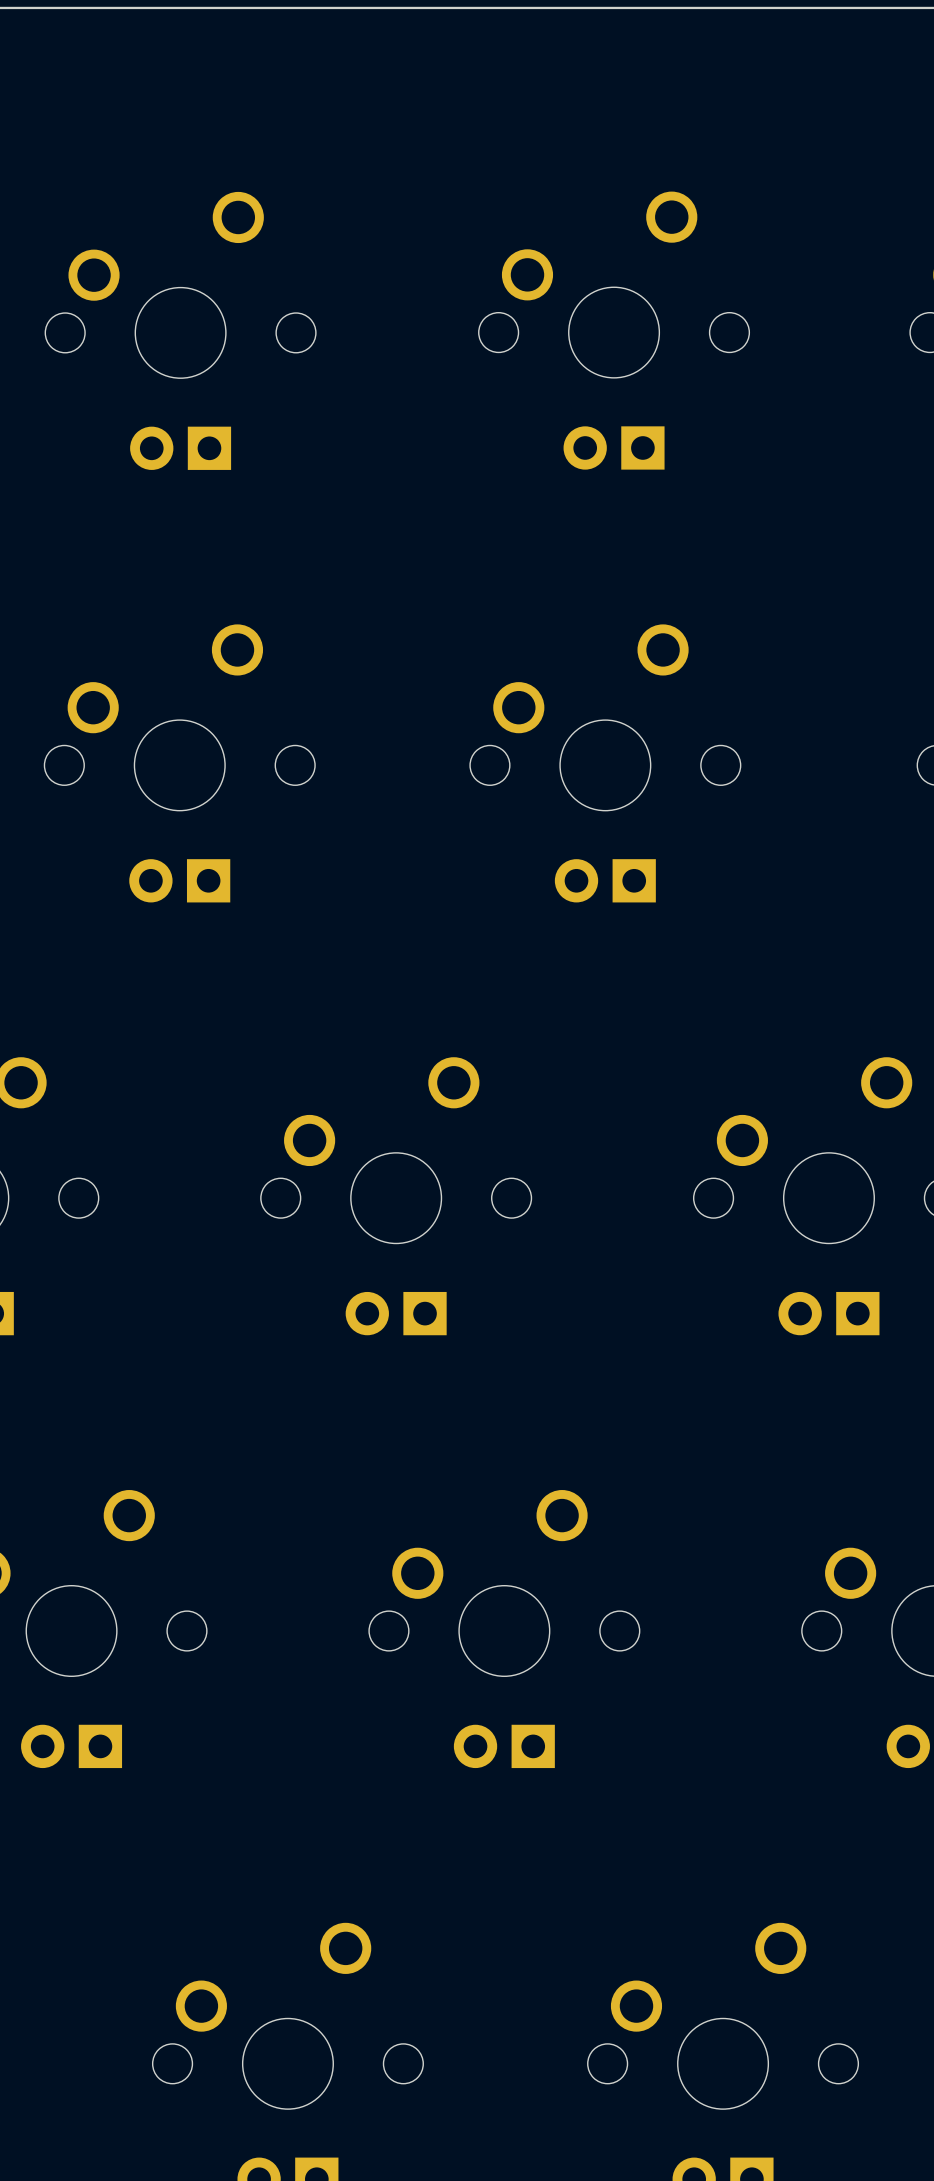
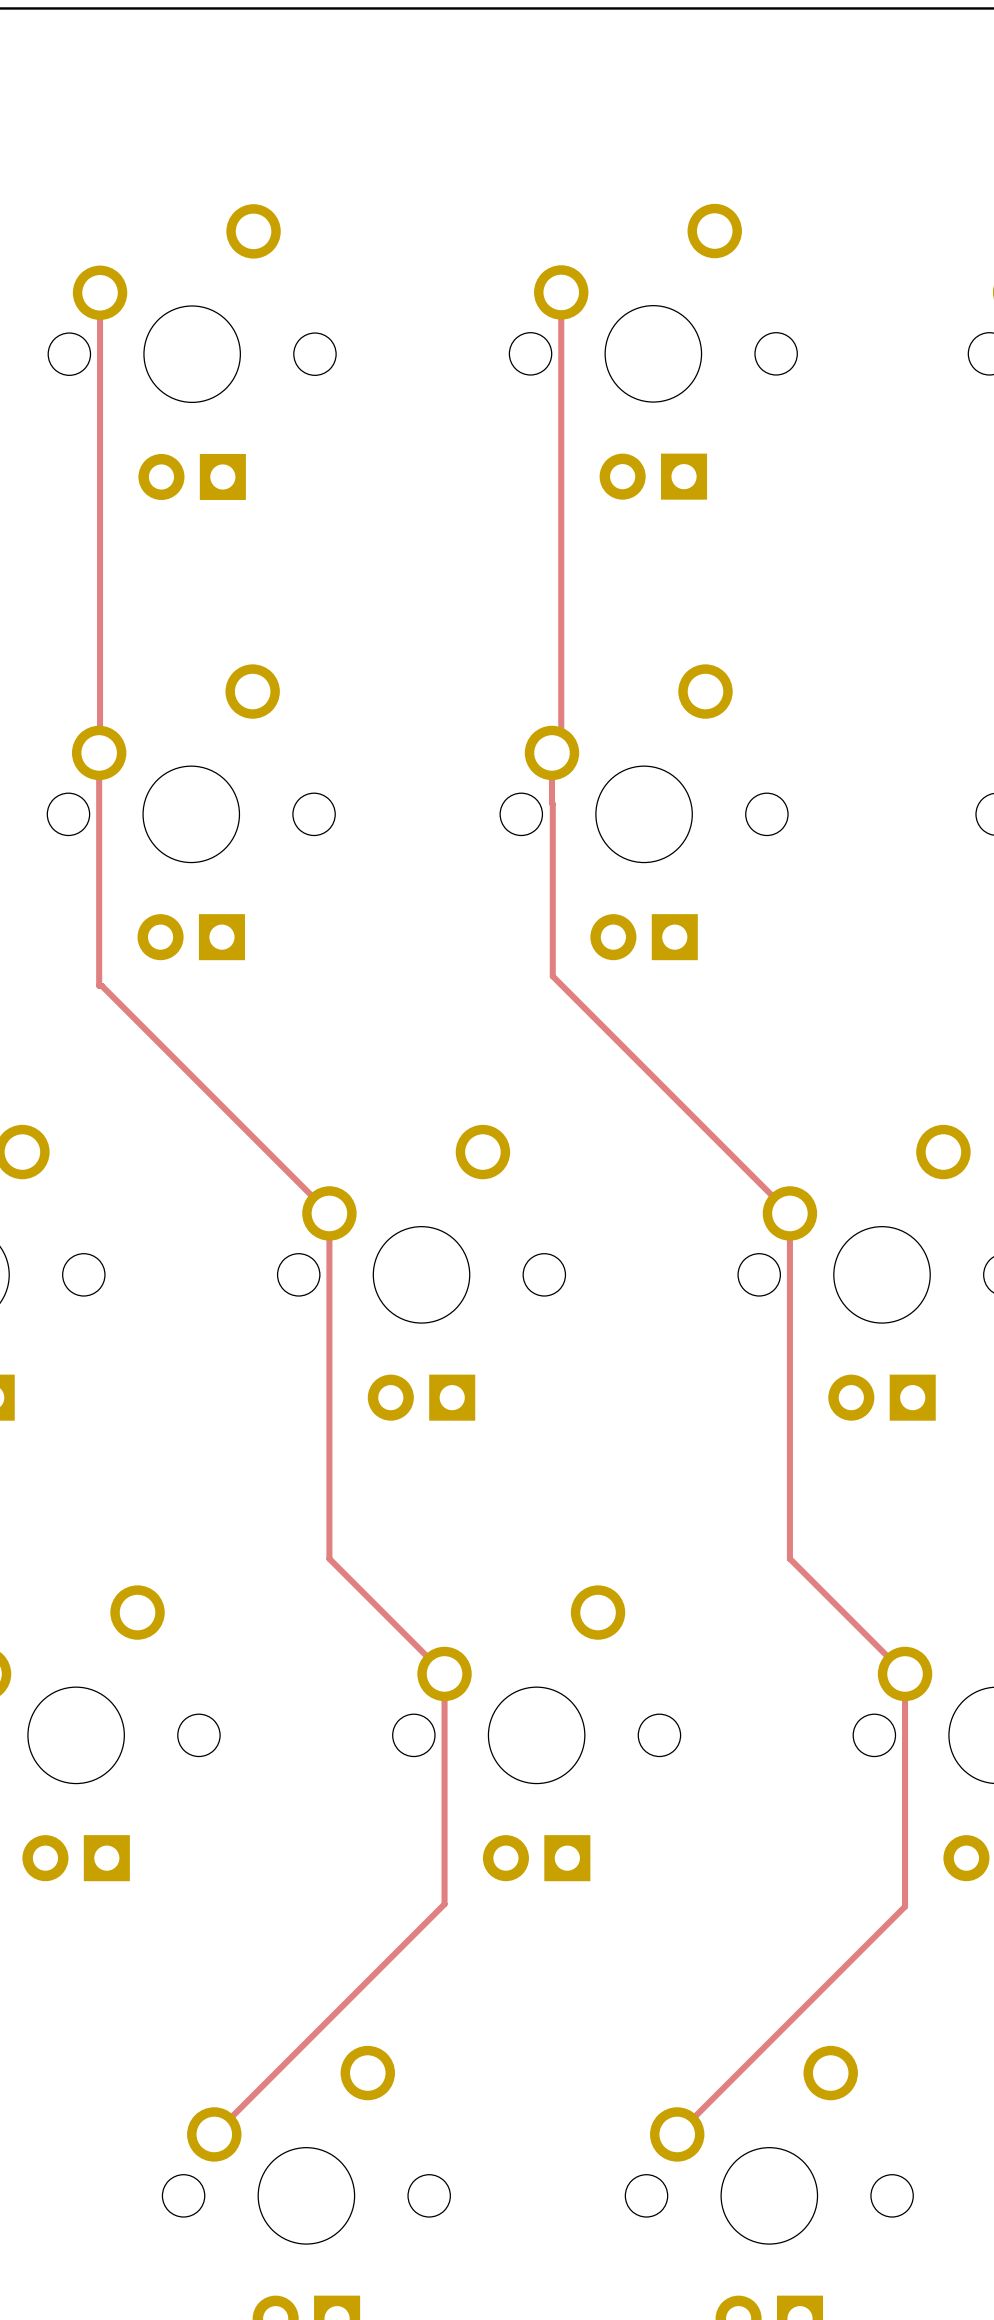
track: none -> (549, 292) (561, 292) (561, 743) (551, 752) (552, 976) (789, 1213) (789, 1558) (905, 1673) (905, 1906) (677, 2134)
track: none -> (88, 292) (100, 292) (99, 752)
track: none -> (99, 752) (99, 985) (101, 985) (329, 1213) (329, 1558) (444, 1673) (444, 1904) (214, 2134)

